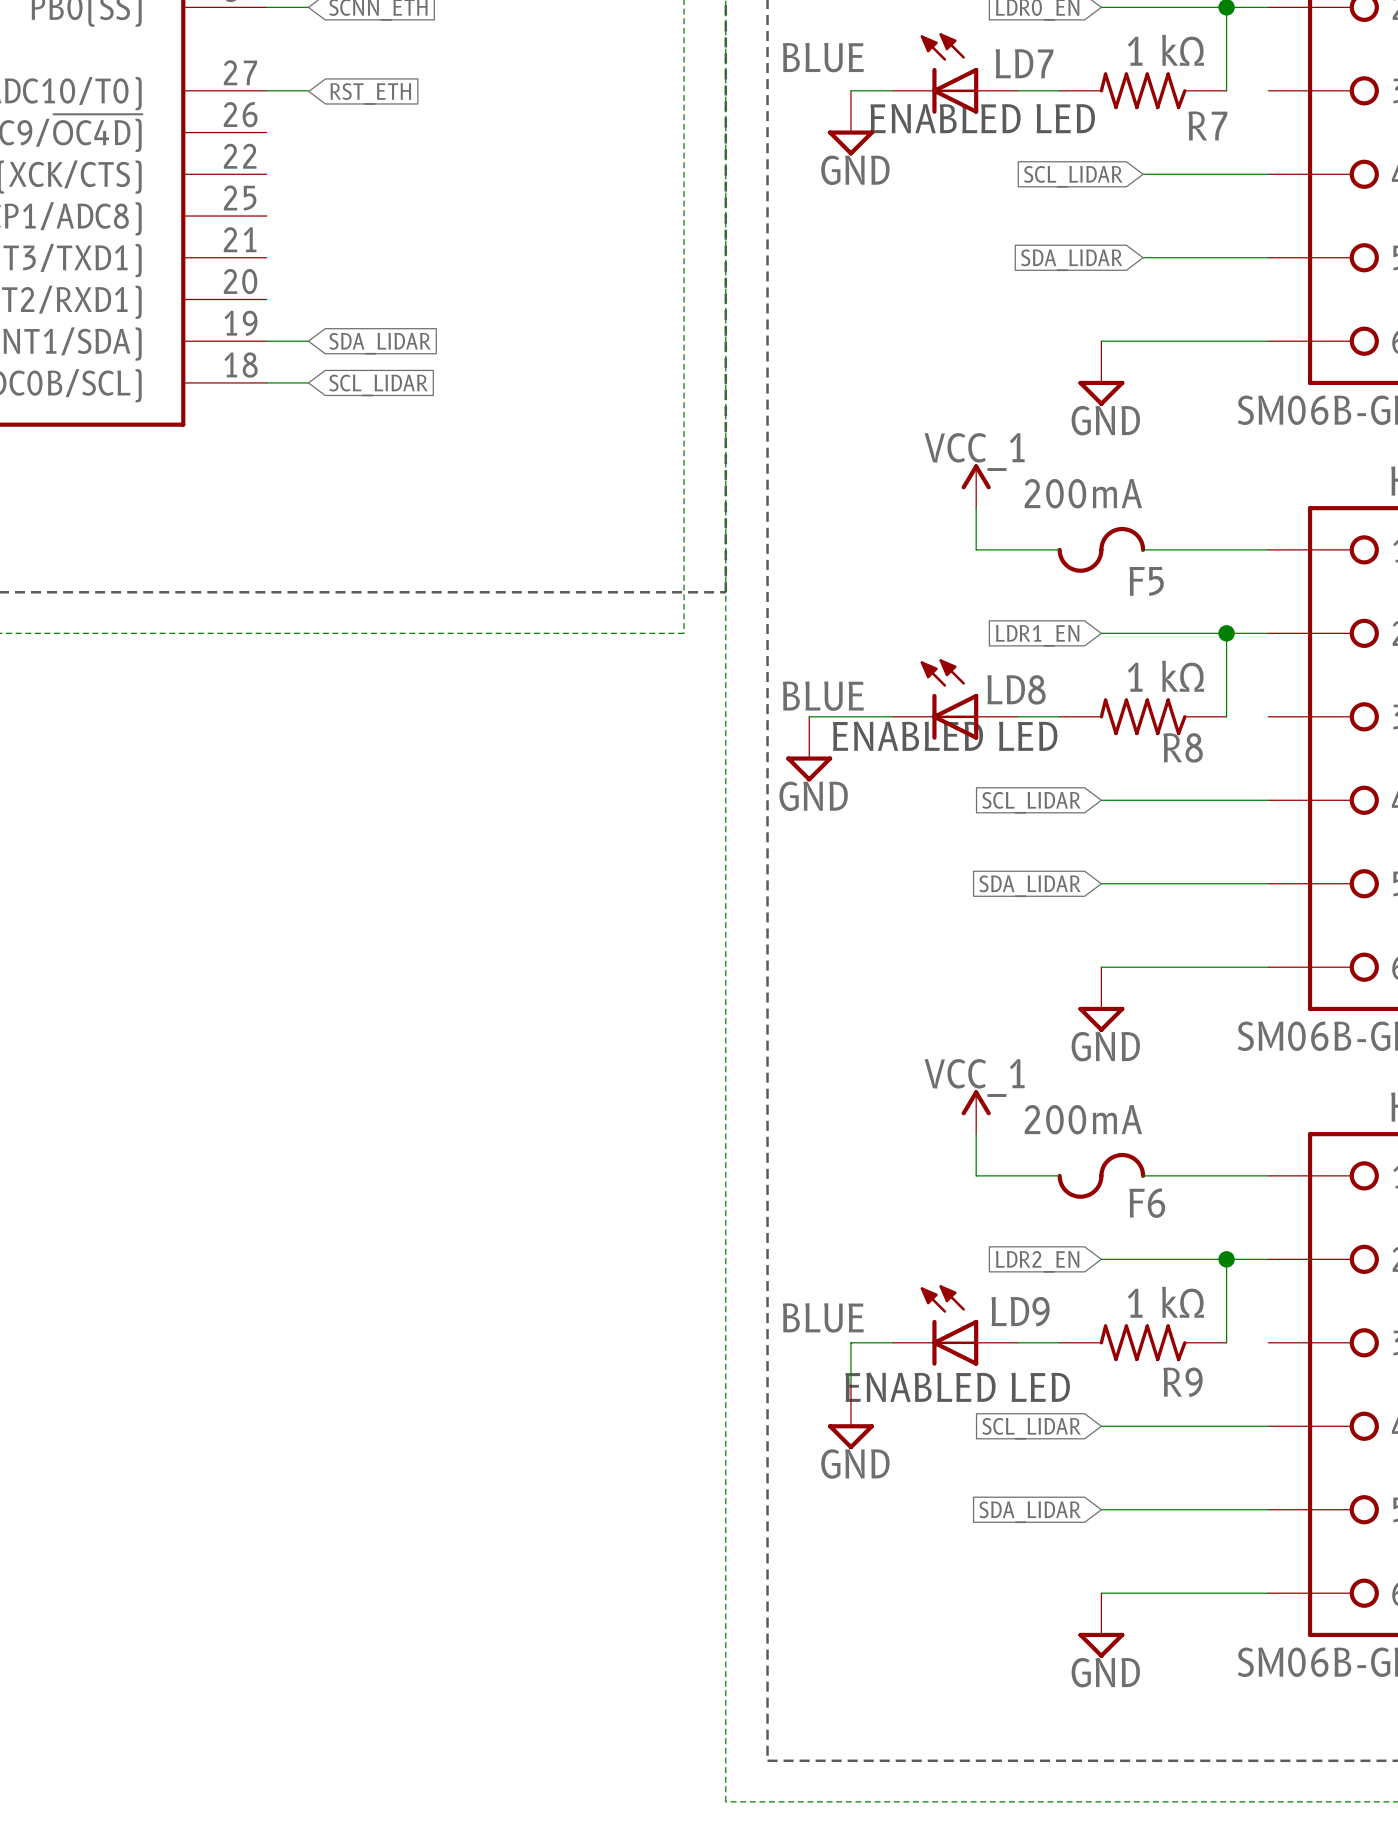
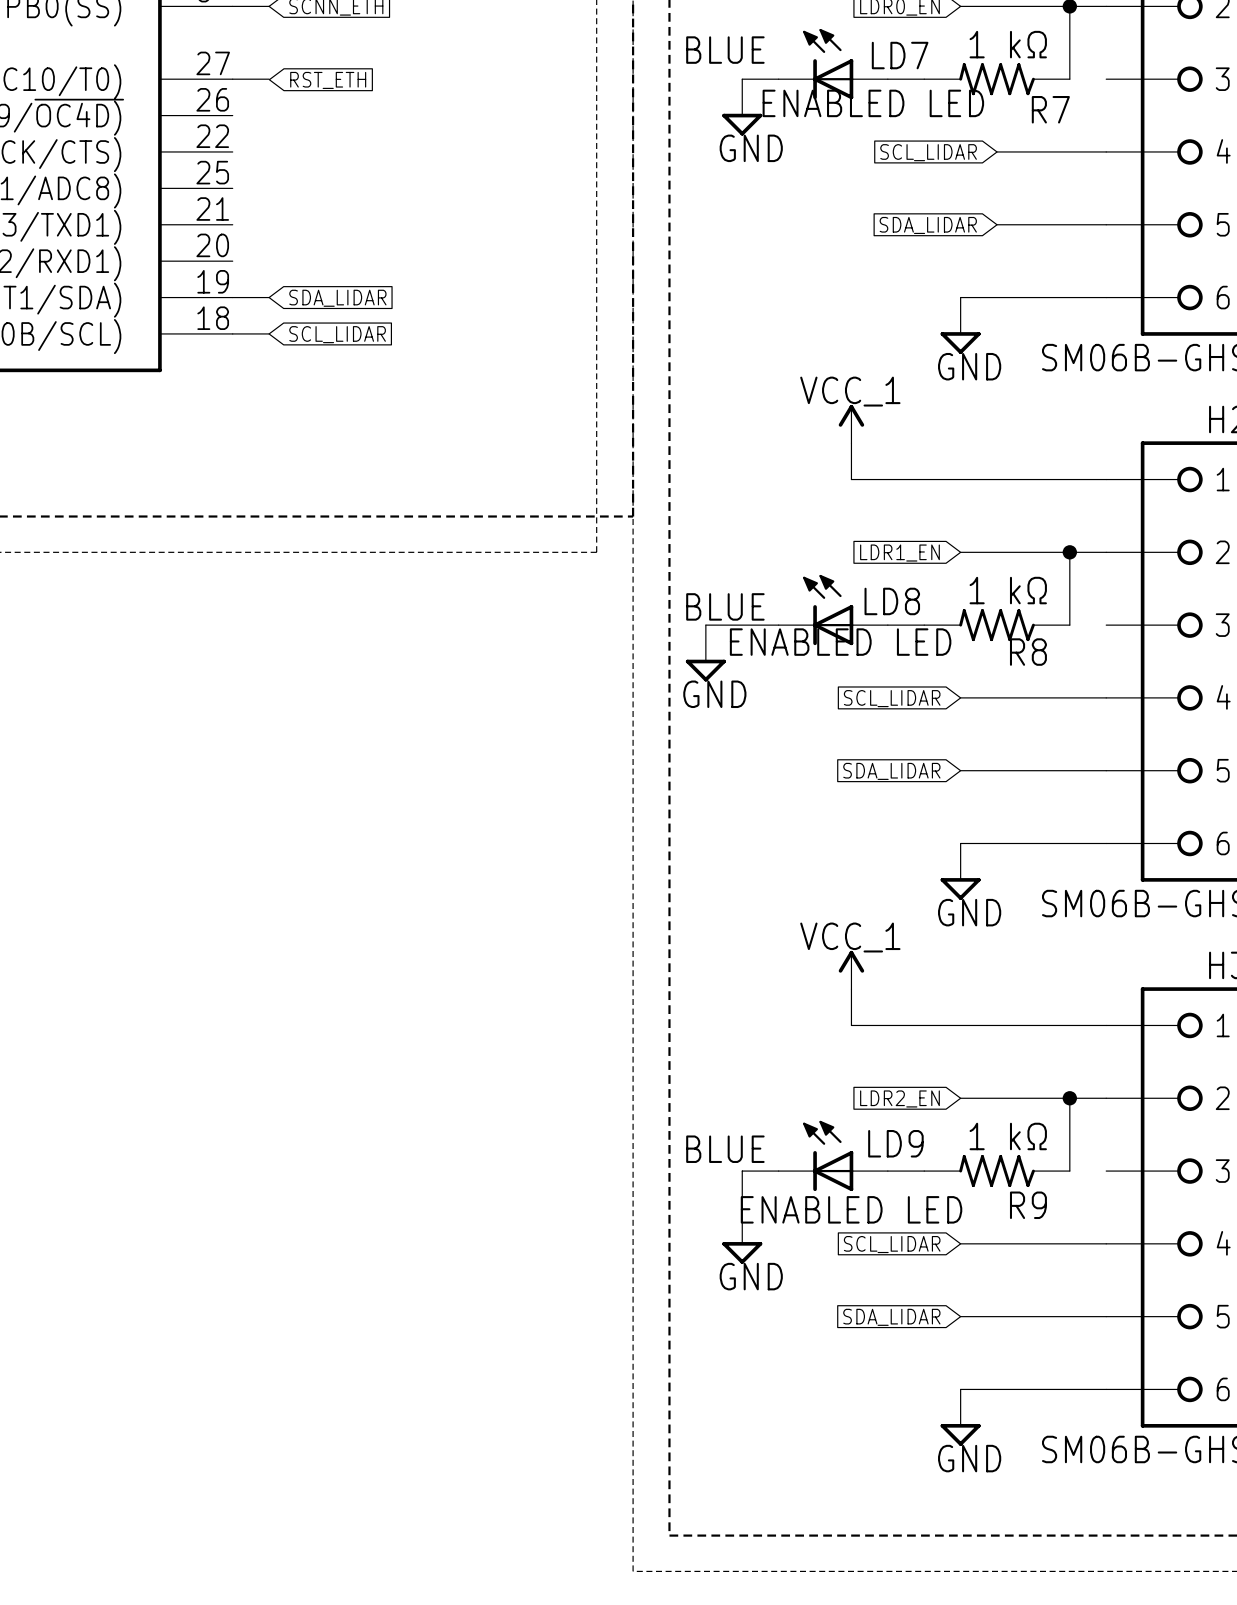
wire: none -> (924, 479) (997, 479)
F5: 200mA (1101, 549) -> none
wire: none -> (924, 1025) (997, 1025)
F6: 200mA (1101, 1175) -> none

